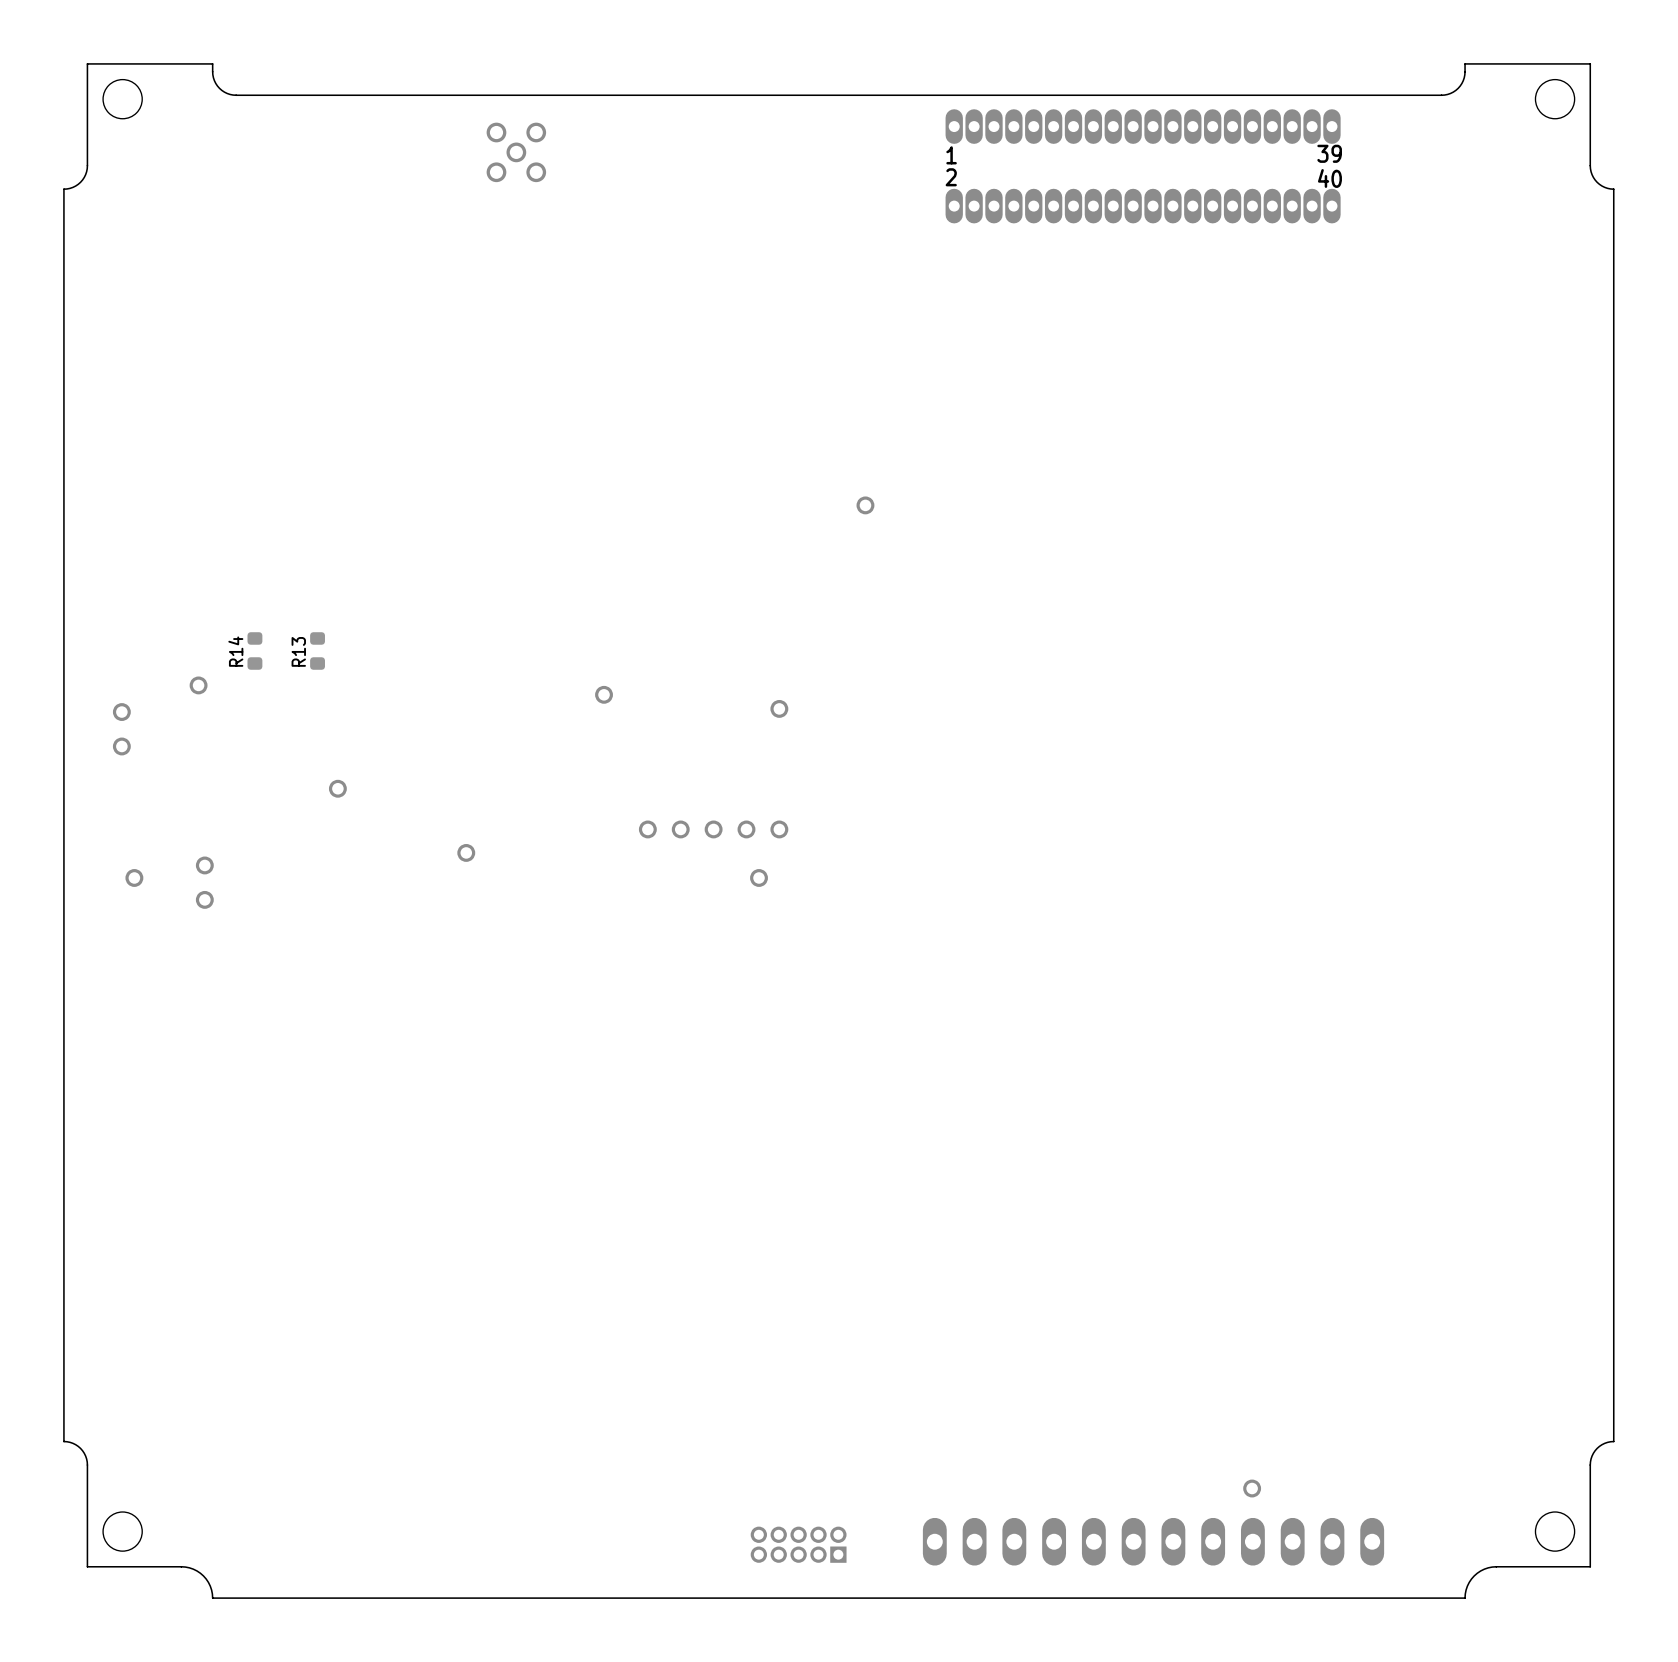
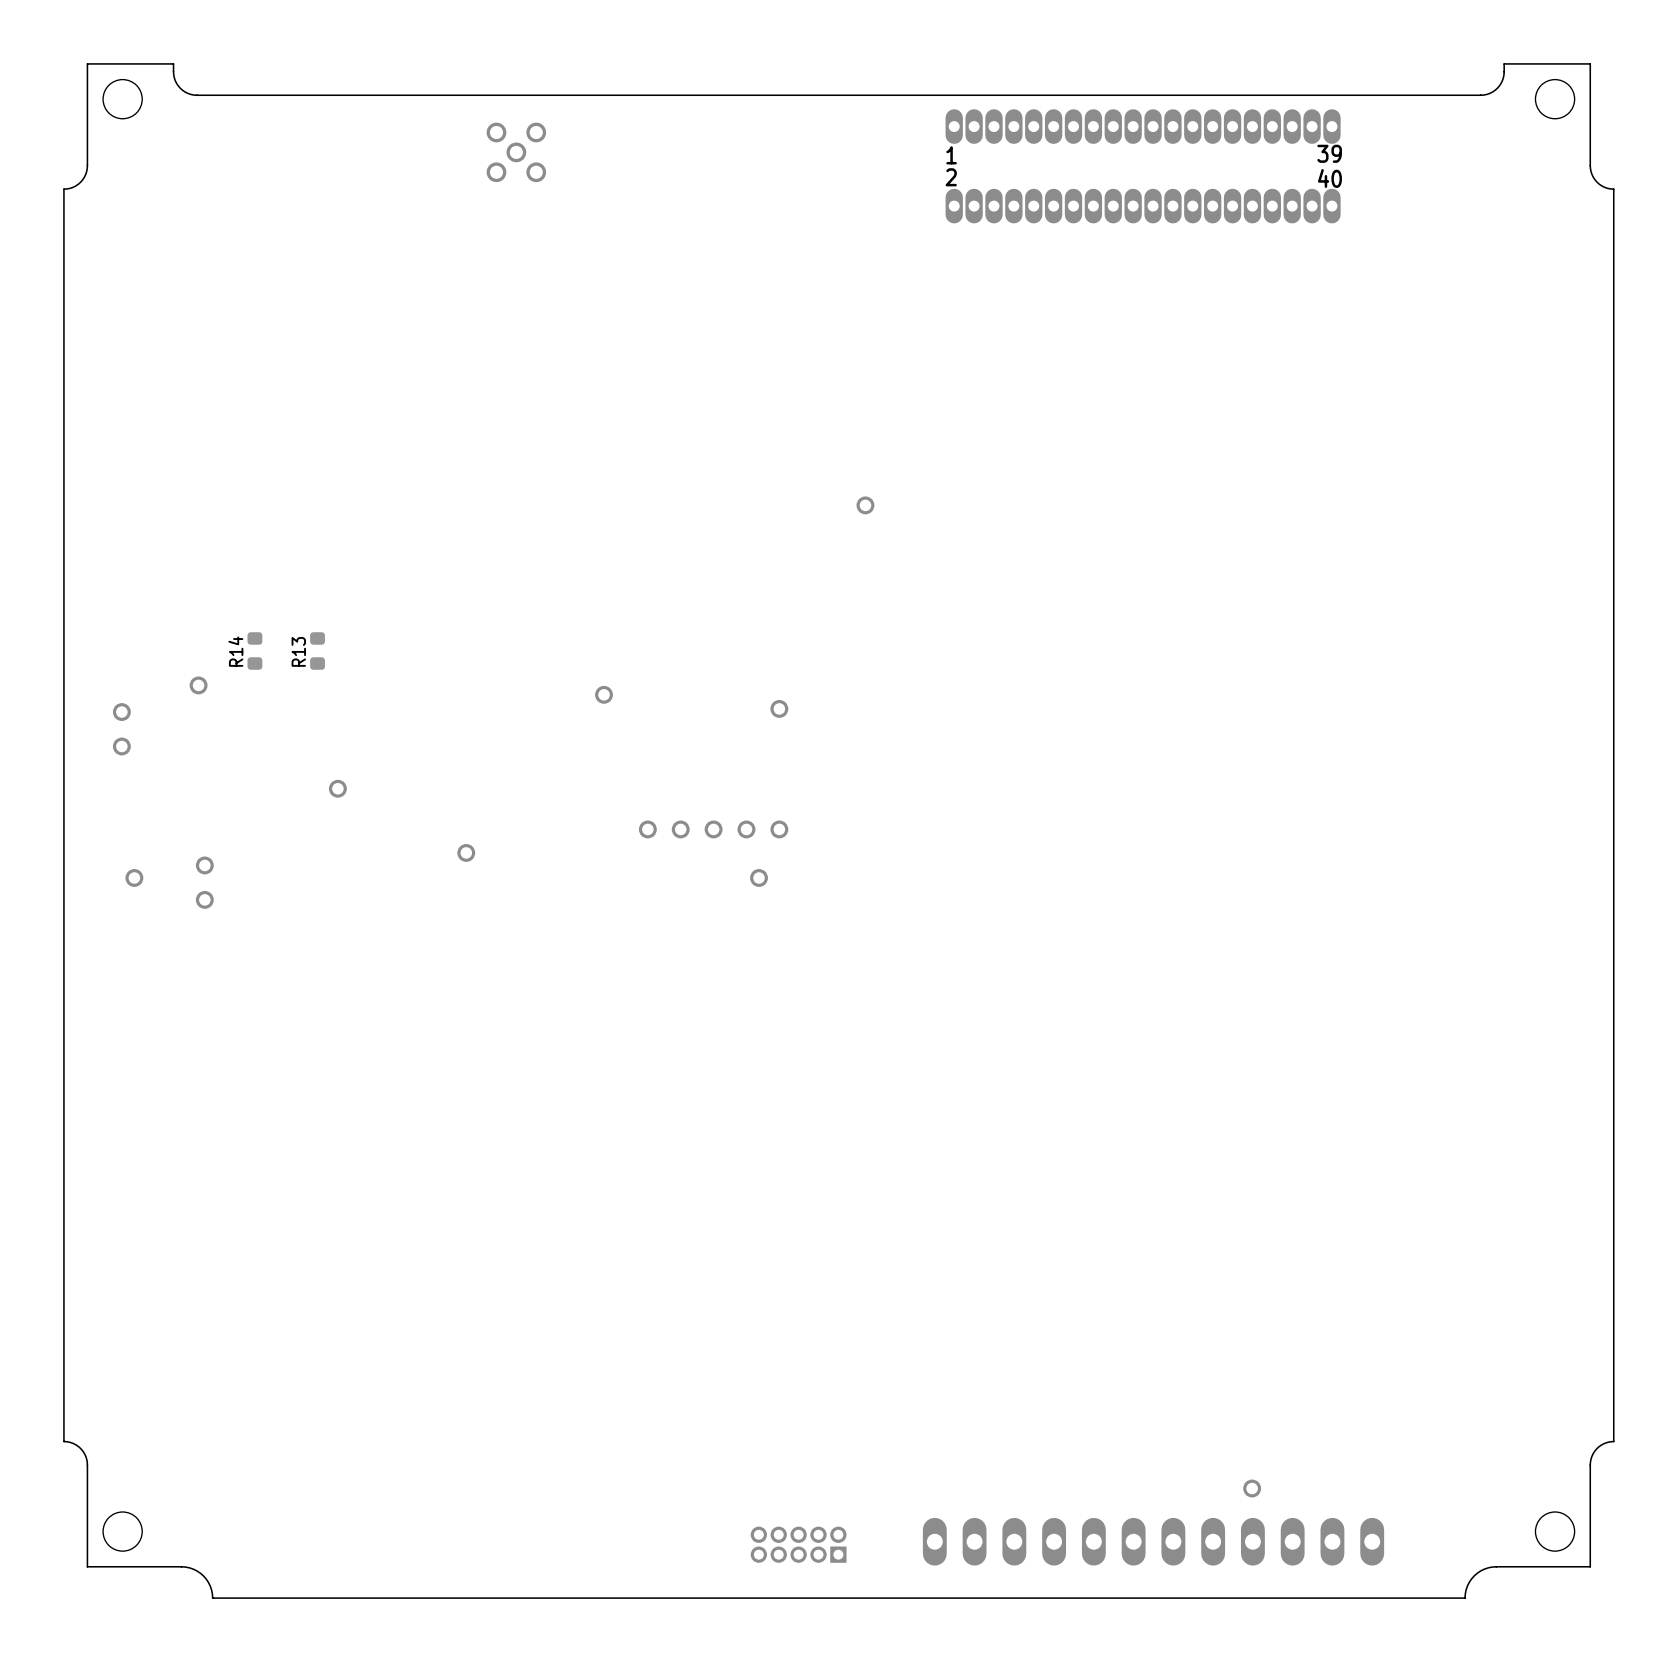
part footprint: [63, 63, 1615, 1599] -> [63, 63, 1615, 1599]

